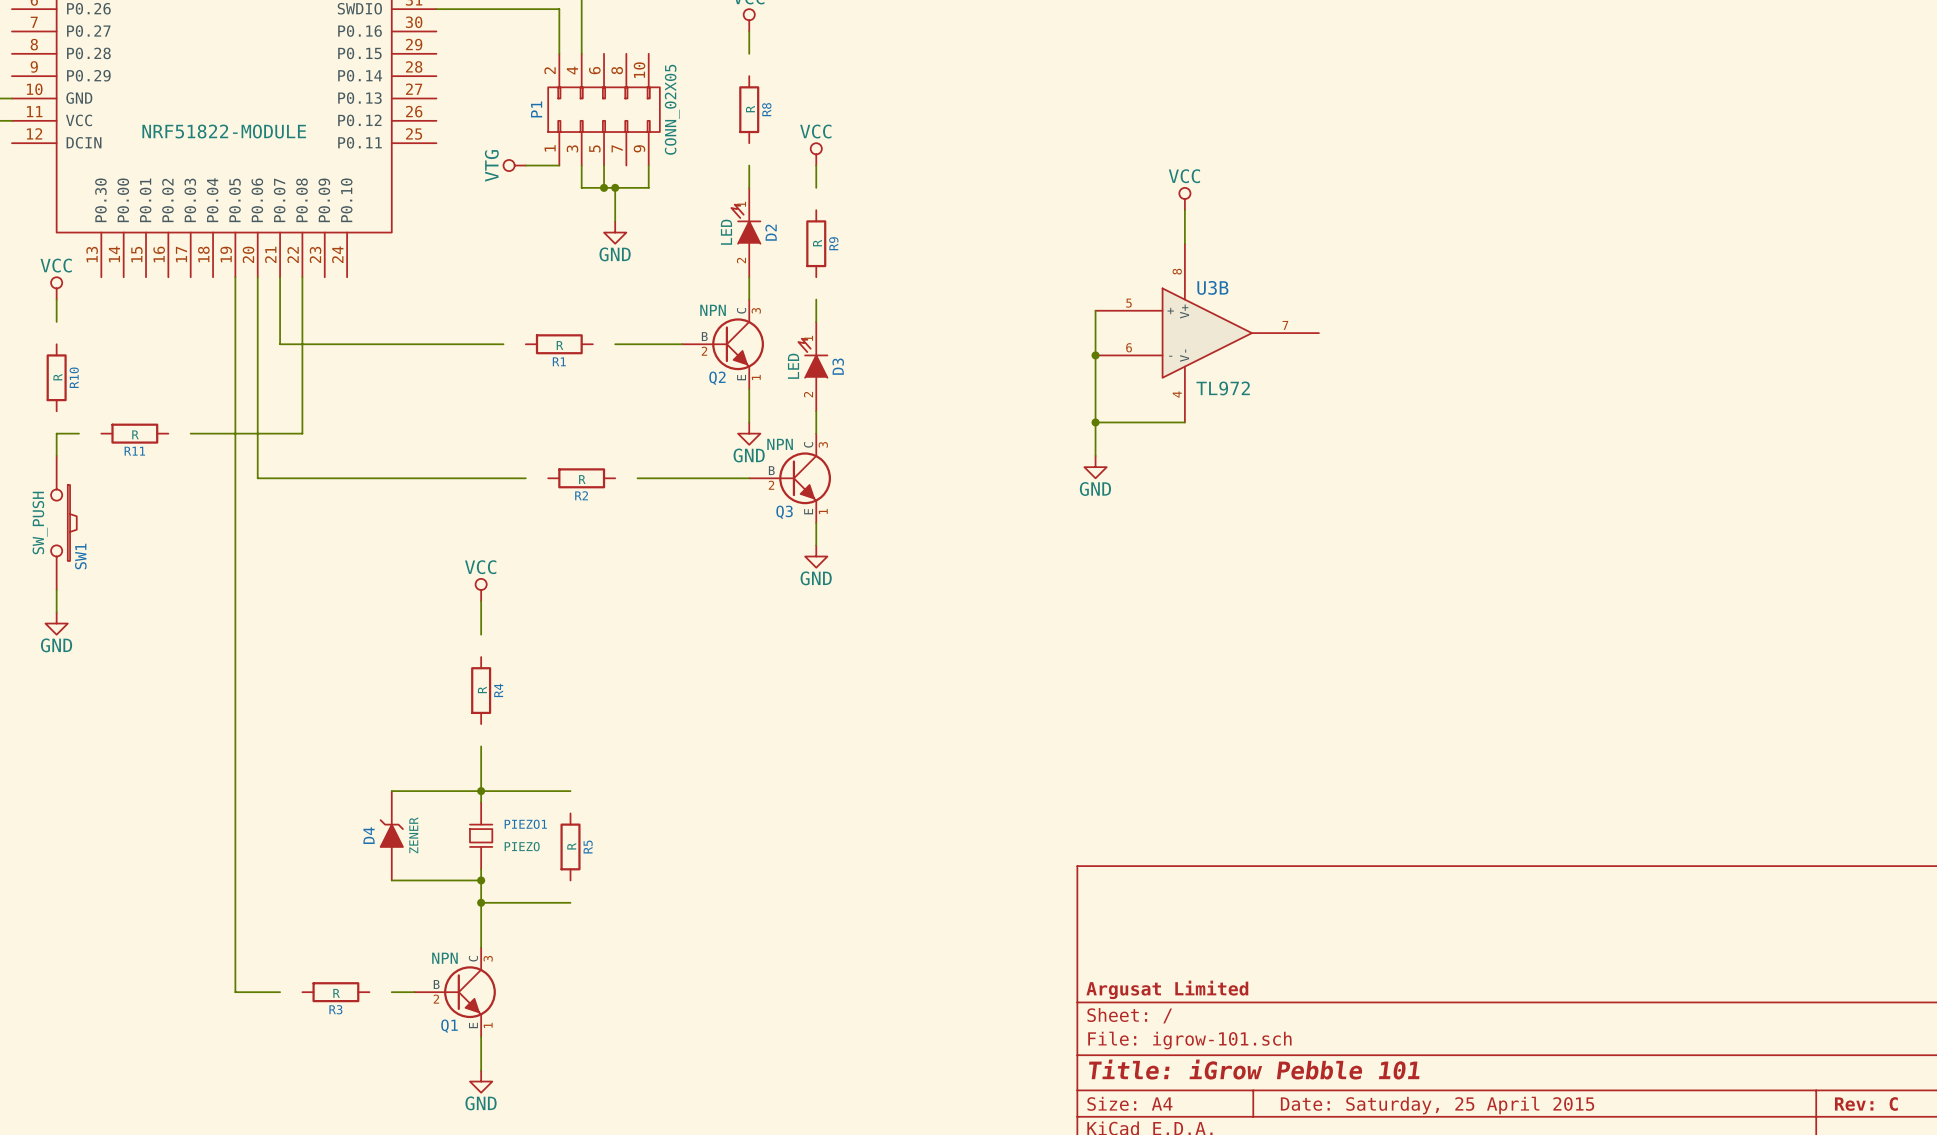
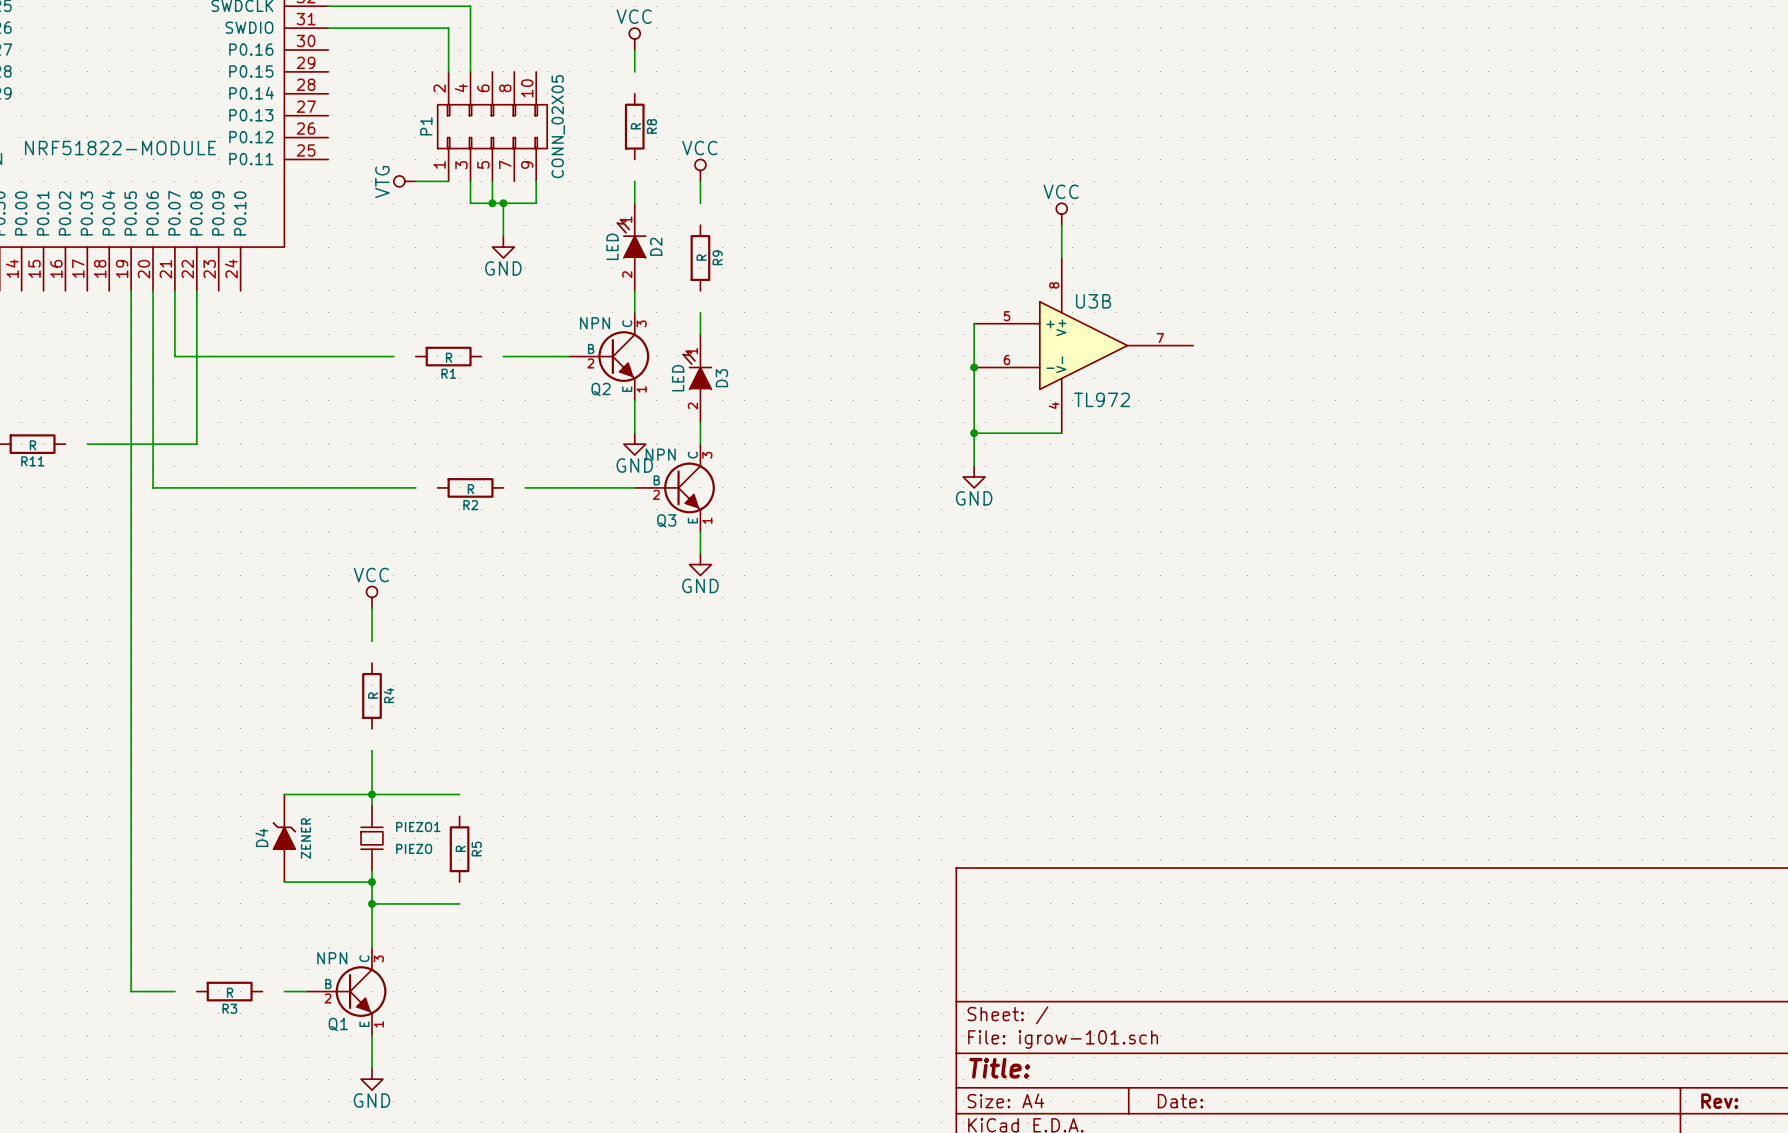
title block: Argusat Limited (1167, 989) -> none
title block: Title: iGrow Pebble 101 (1254, 1069) -> Title: (999, 1068)
title block: Rev: C (1866, 1103) -> Rev: (1719, 1101)
title block: Date: Saturday, 25 April 2015 (1437, 1105) -> Date: (1180, 1101)

